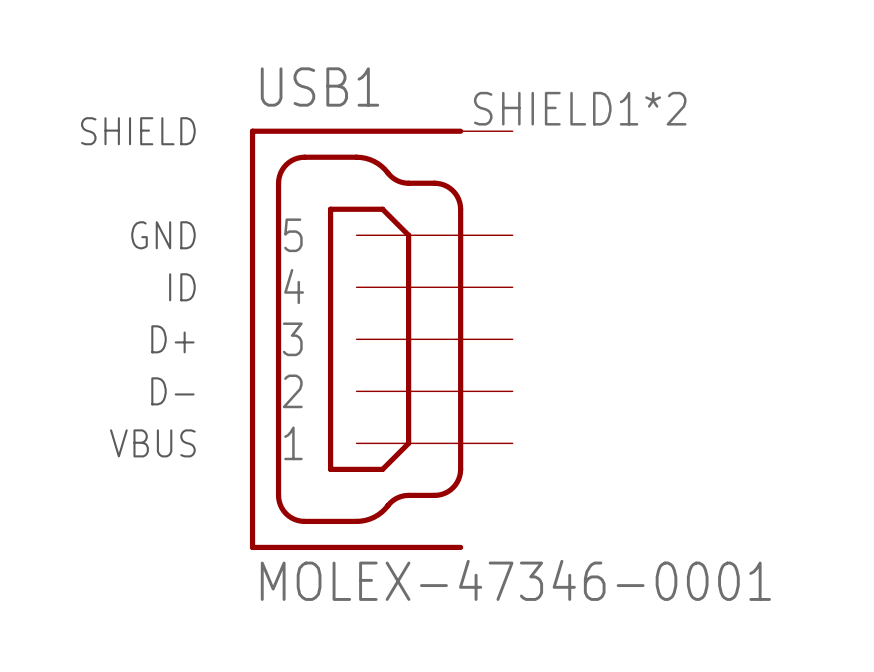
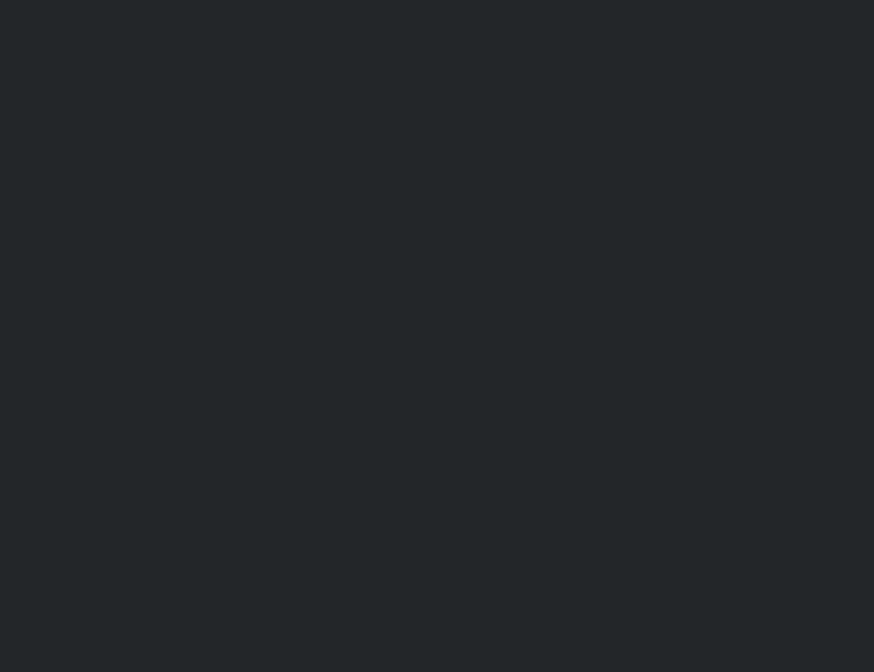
USB1: MOLEX-47346-0001 (381, 339) -> none

